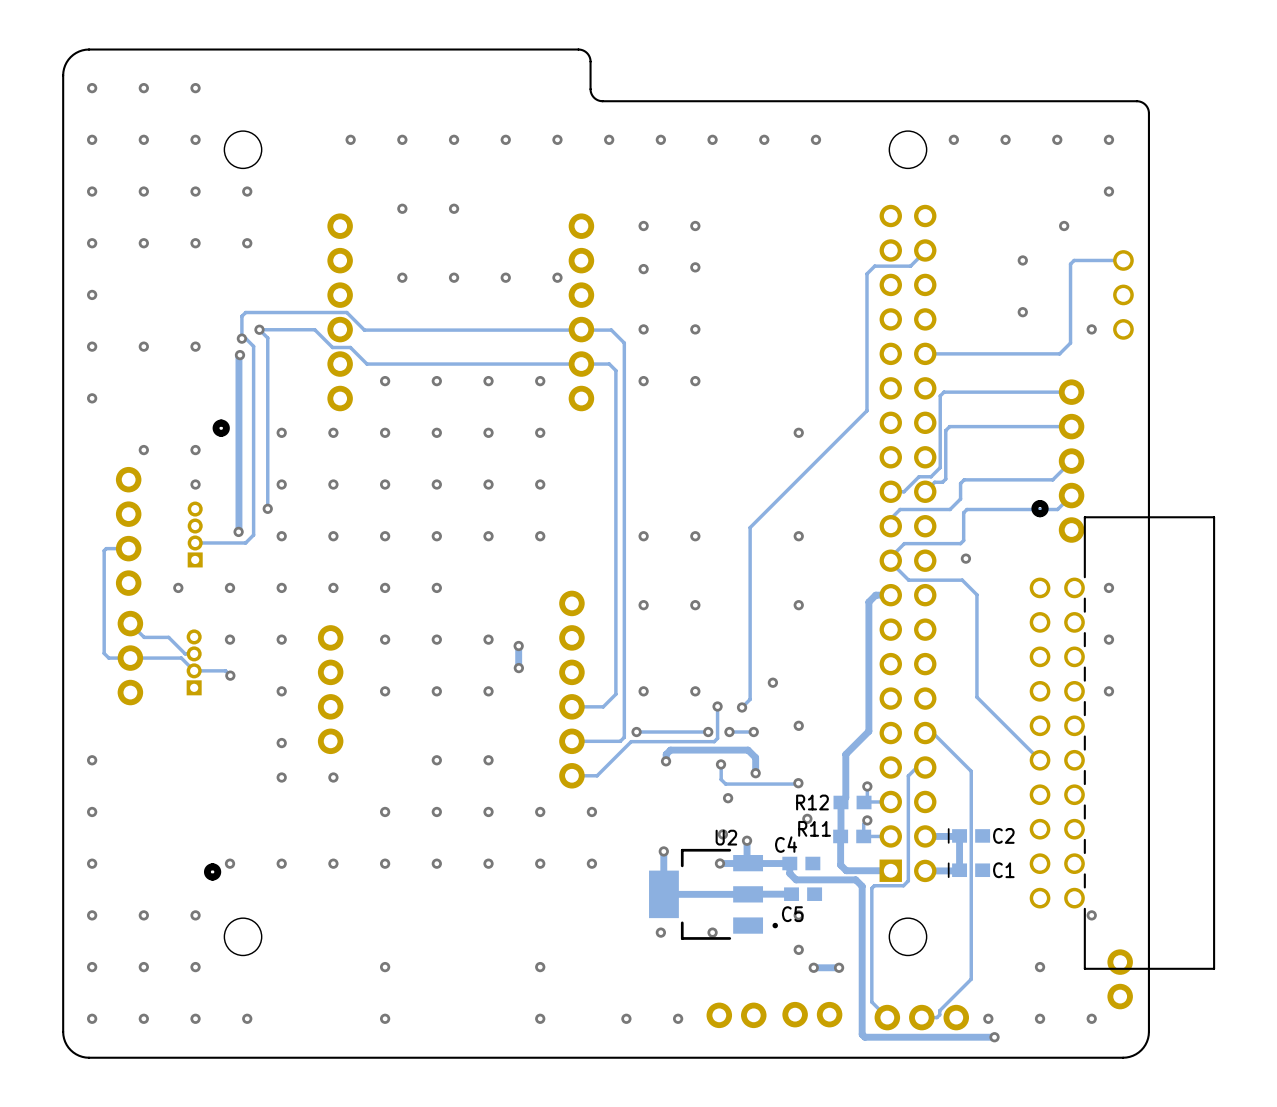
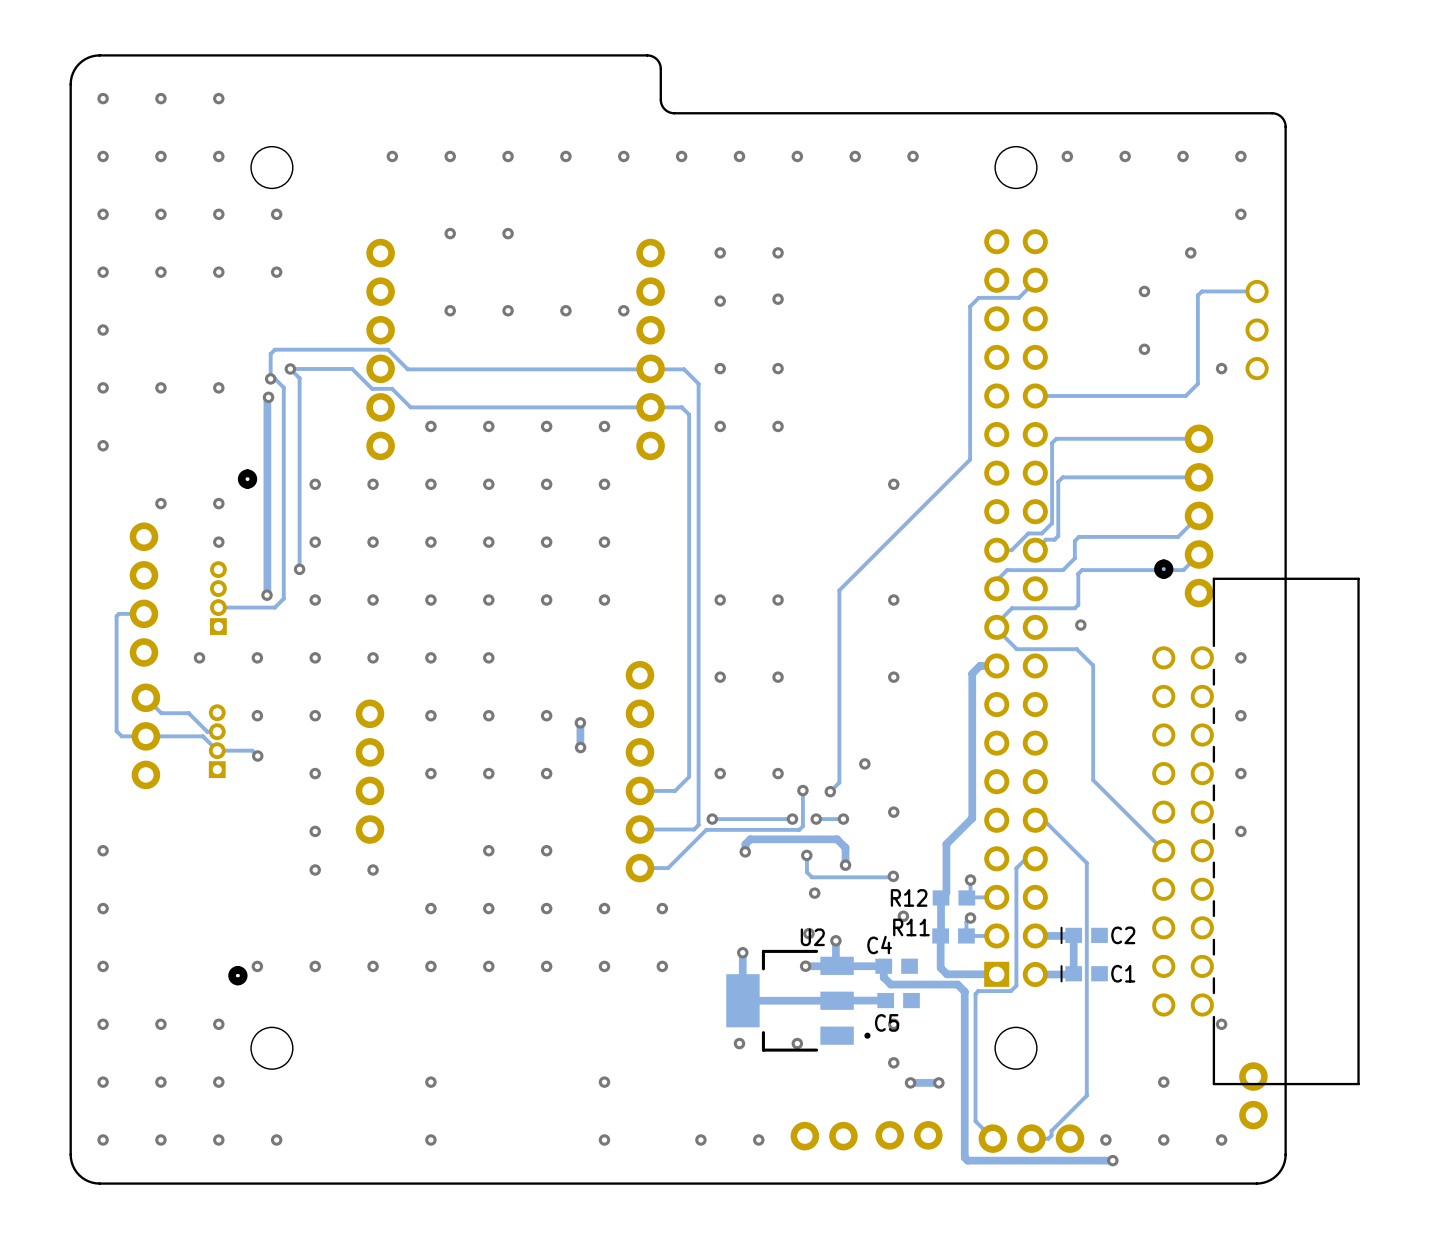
via: none -> (1240, 831)

